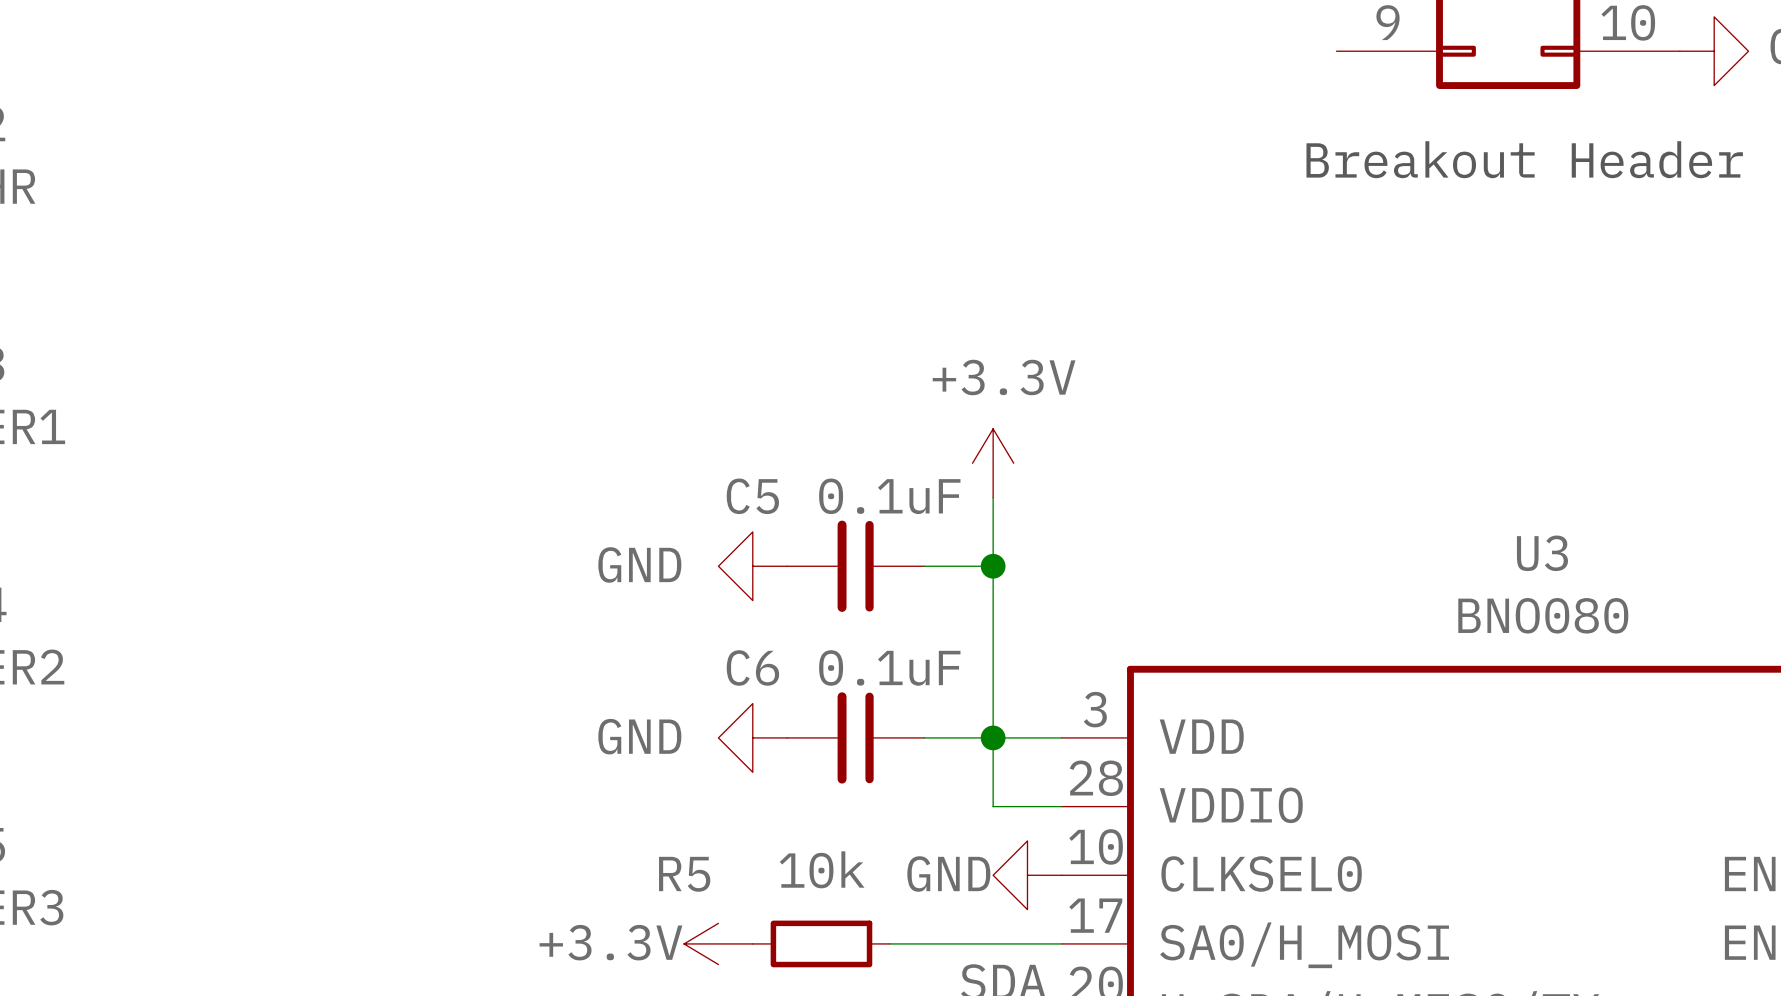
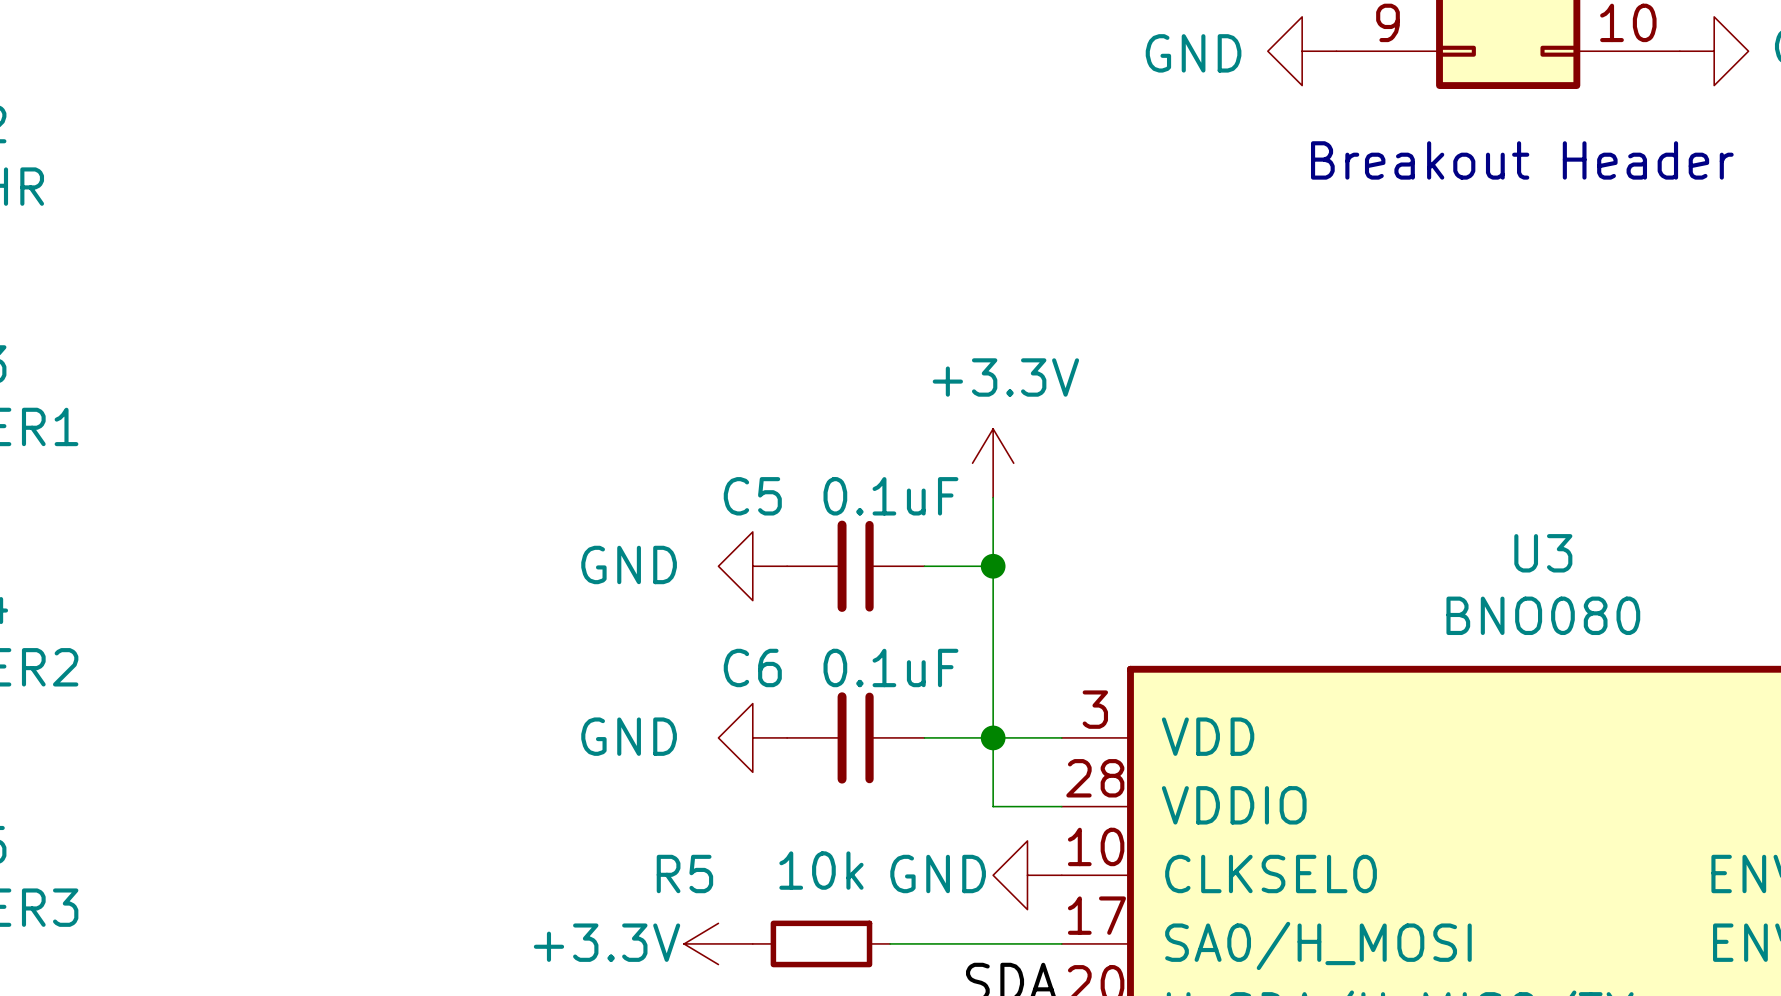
power symbol: none -> GND (1302, 51)

